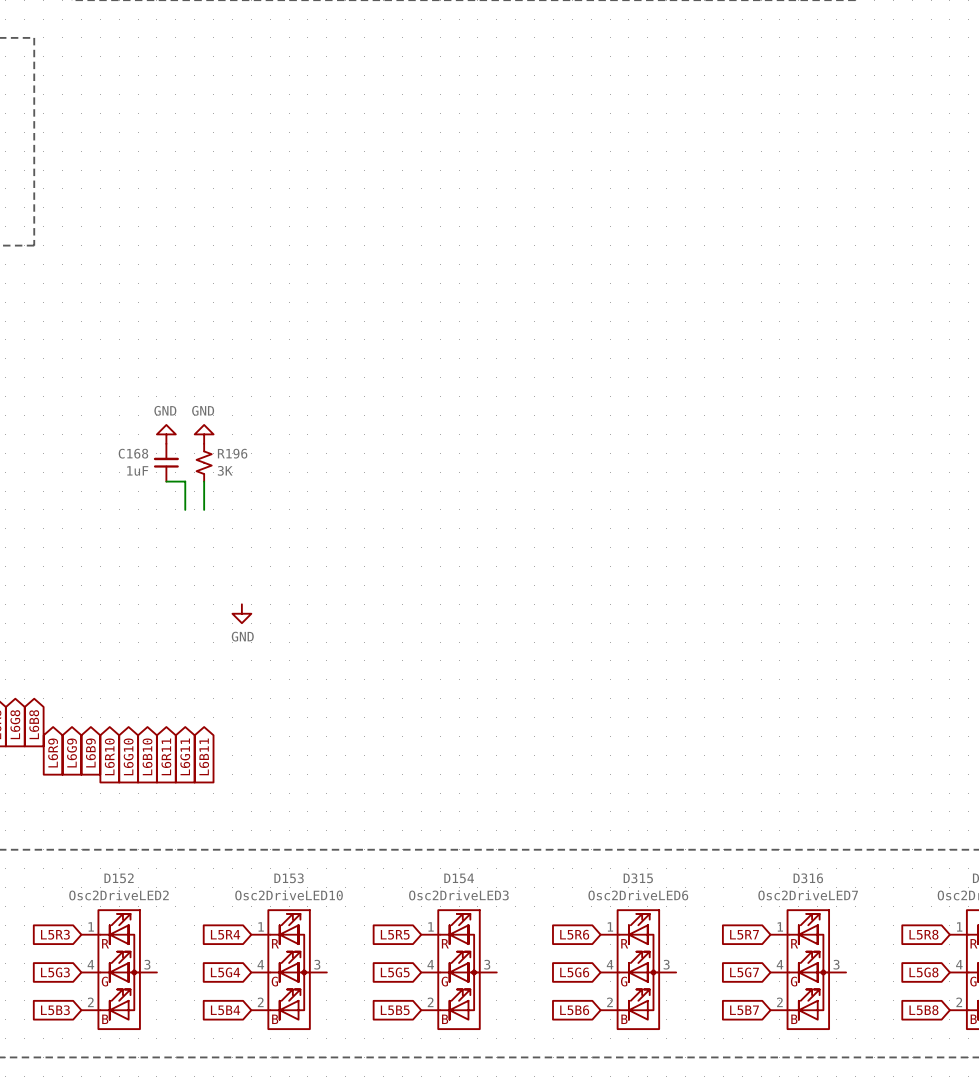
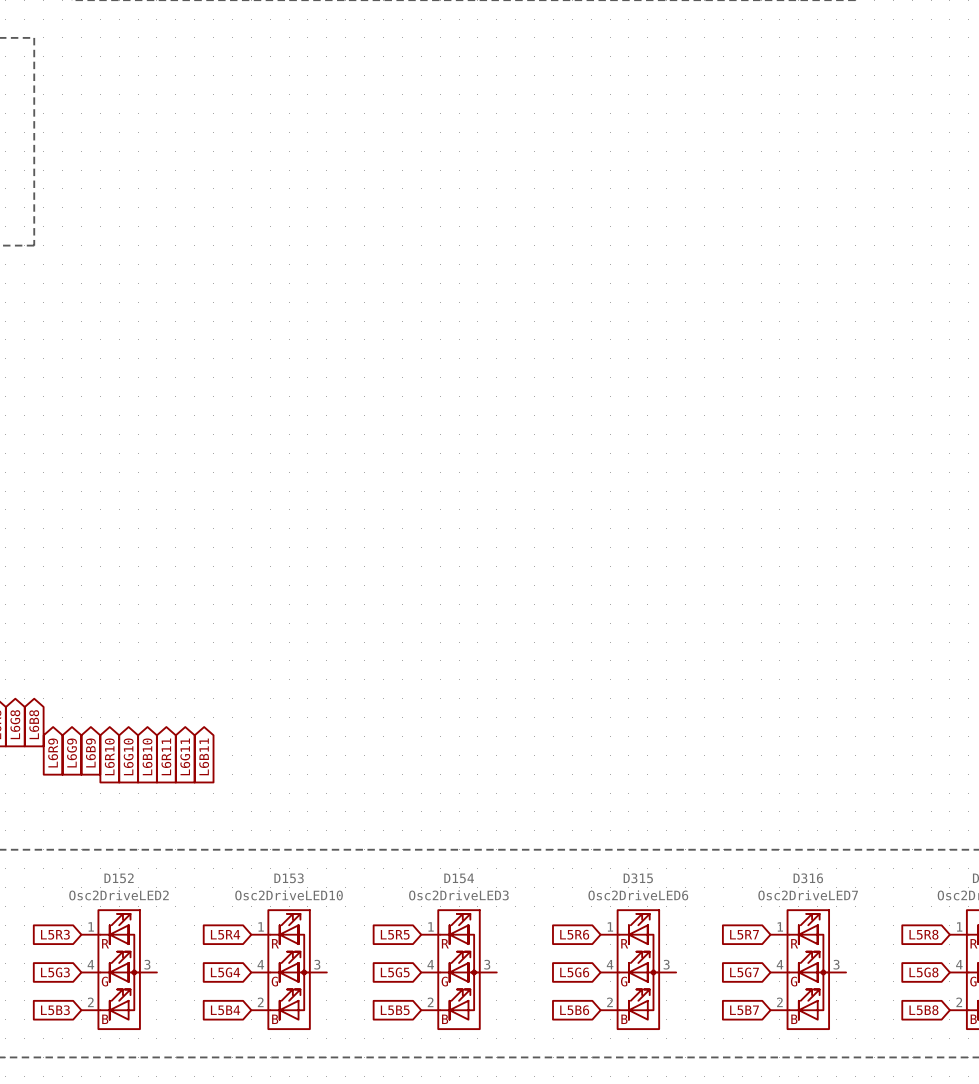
power symbol: GND (166, 434) -> none
power symbol: GND (204, 434) -> none
C168: 1uF (166, 462) -> none
R196: 3K (204, 462) -> none
wire: (166, 481) (185, 481) (185, 509) -> none
wire: (204, 481) (204, 509) -> none
power symbol: GND (241, 613) -> none

